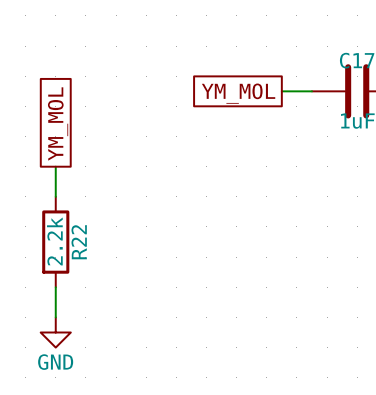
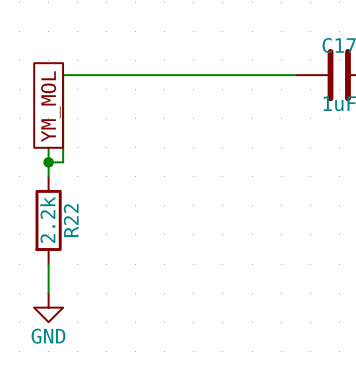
wire: none -> (266, 75) (63, 75) (63, 162) (48, 162)
global label: YM_MOL (238, 93) -> none
junction: none -> (48, 162)

